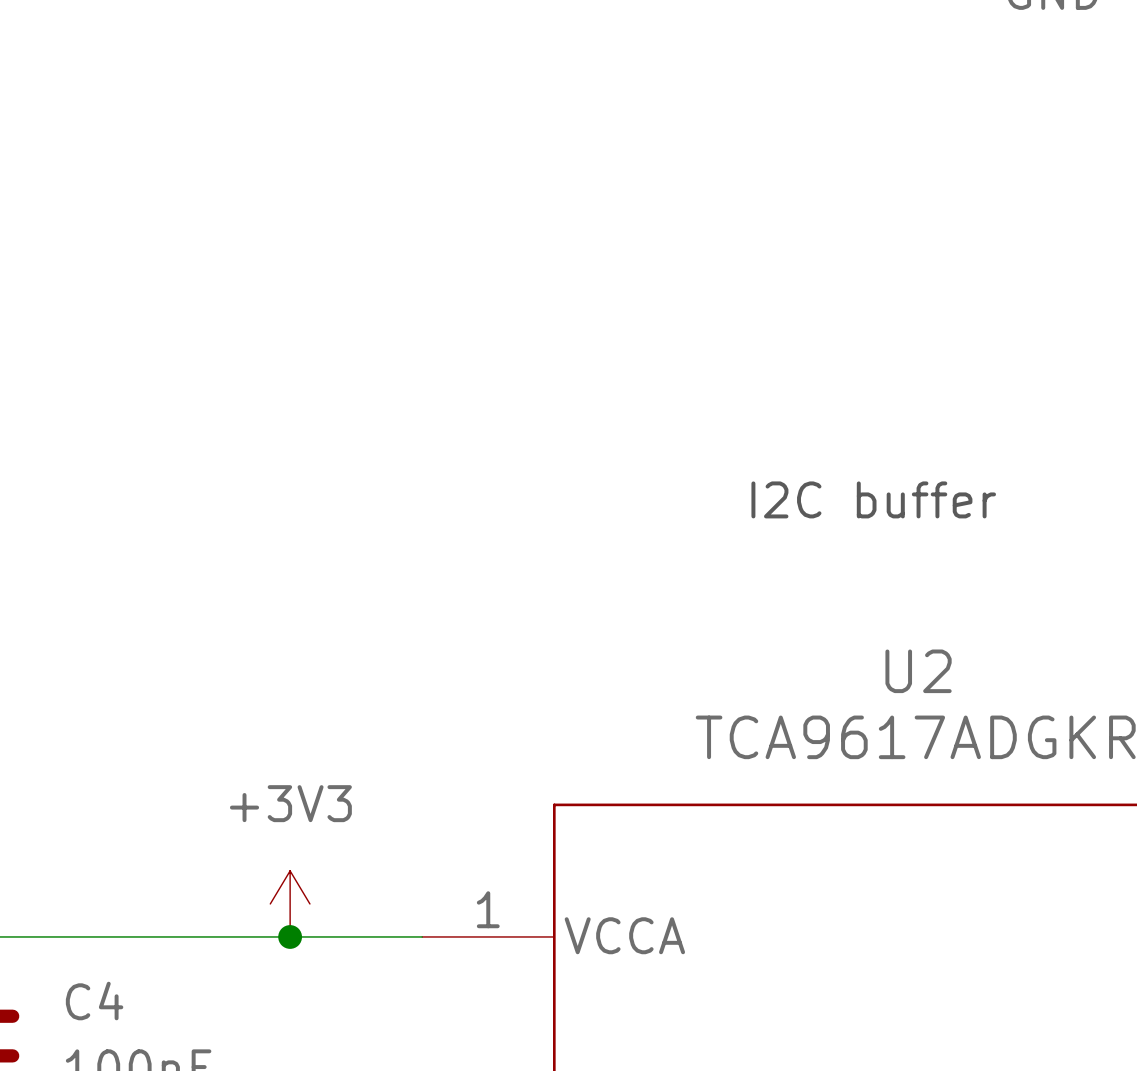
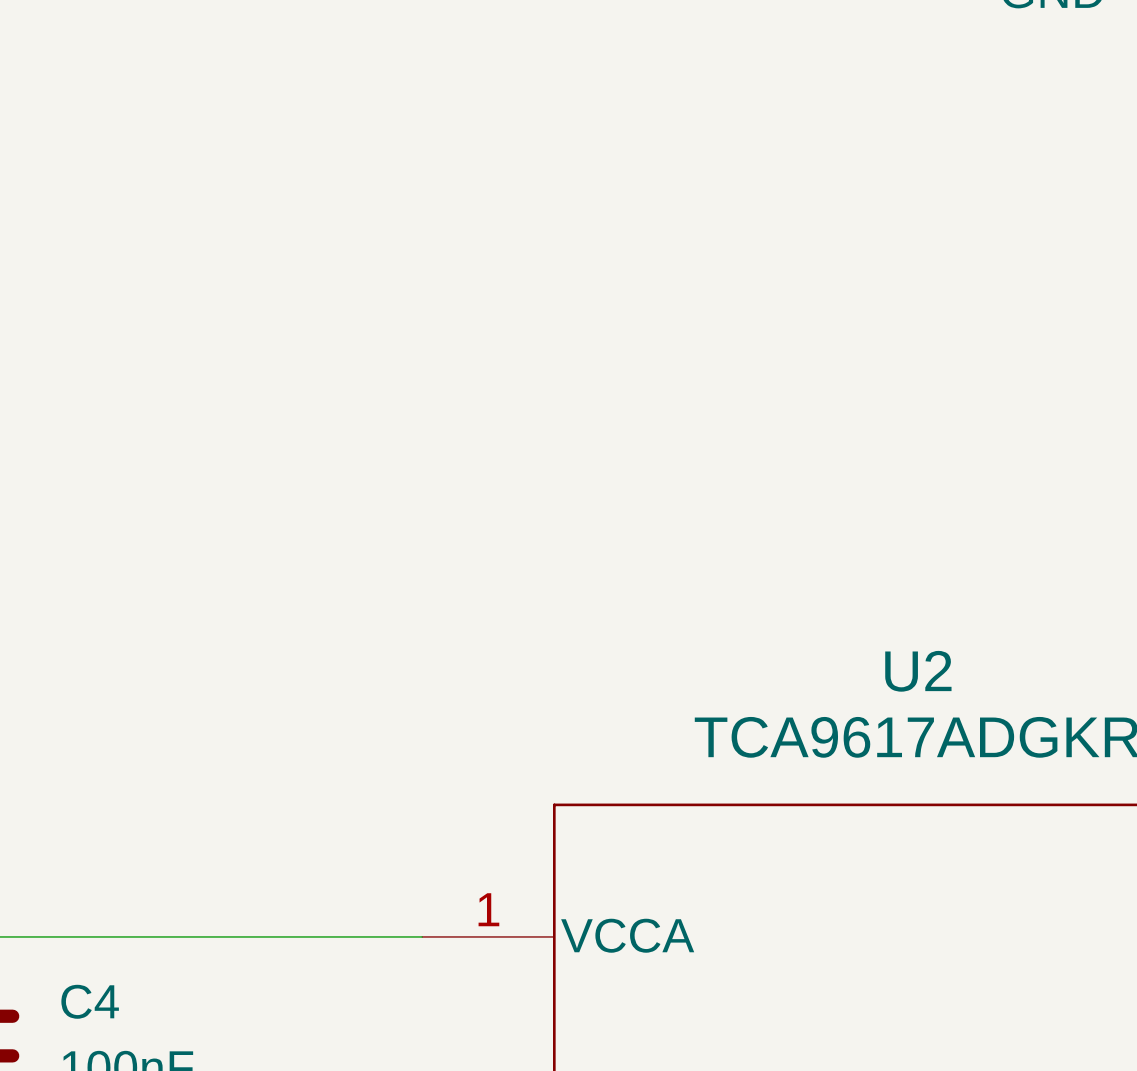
text: I2C buffer (873, 499) -> none
power symbol: +3V3 (290, 903) -> none
junction: (290, 936) -> none

